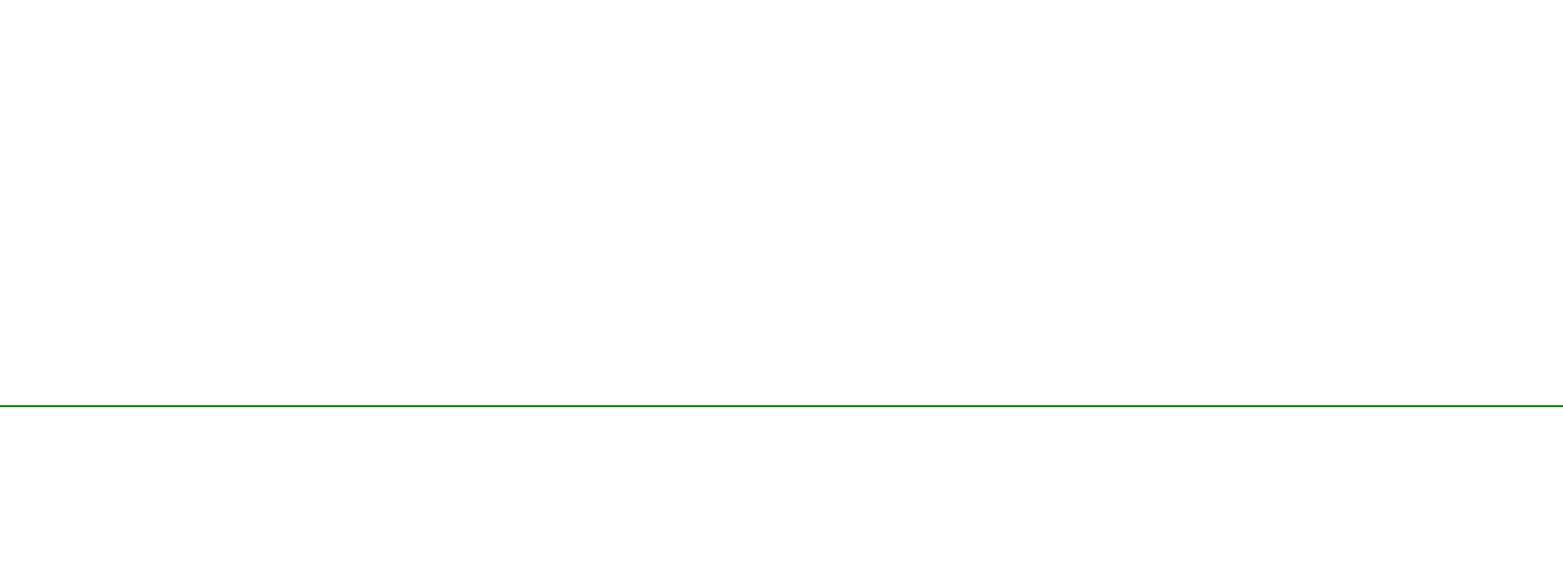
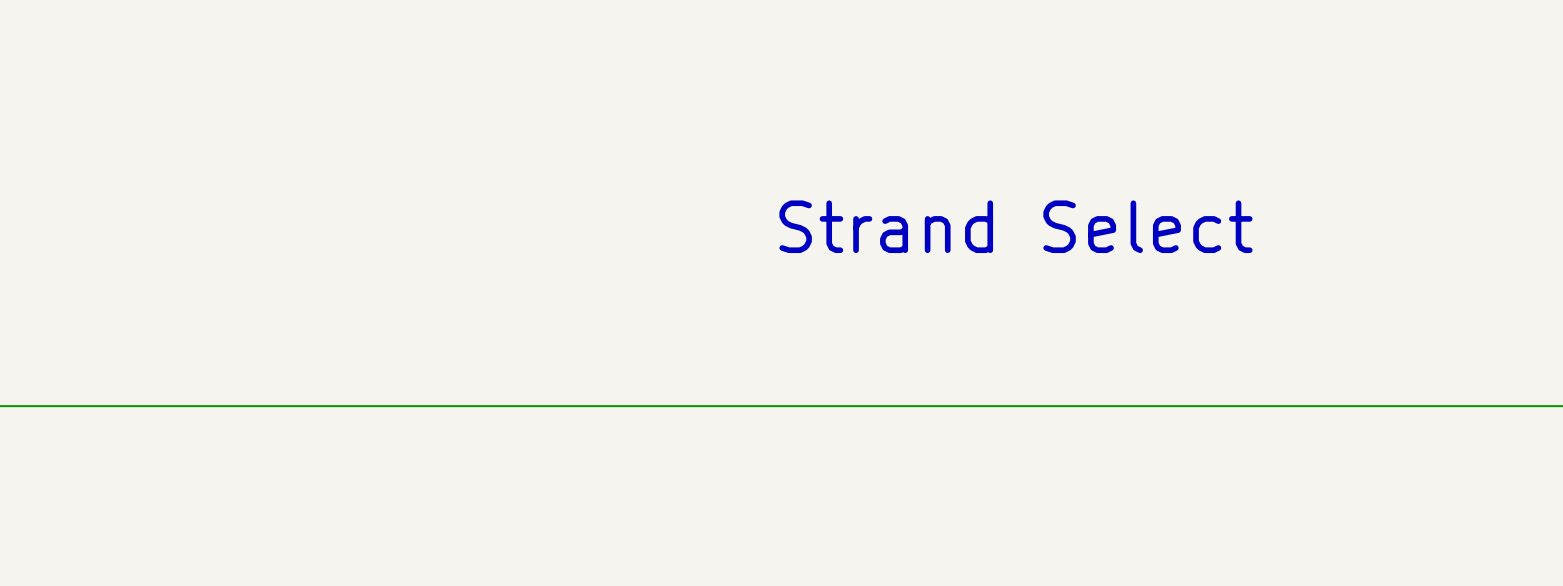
text: none -> Strand Select (1015, 226)

